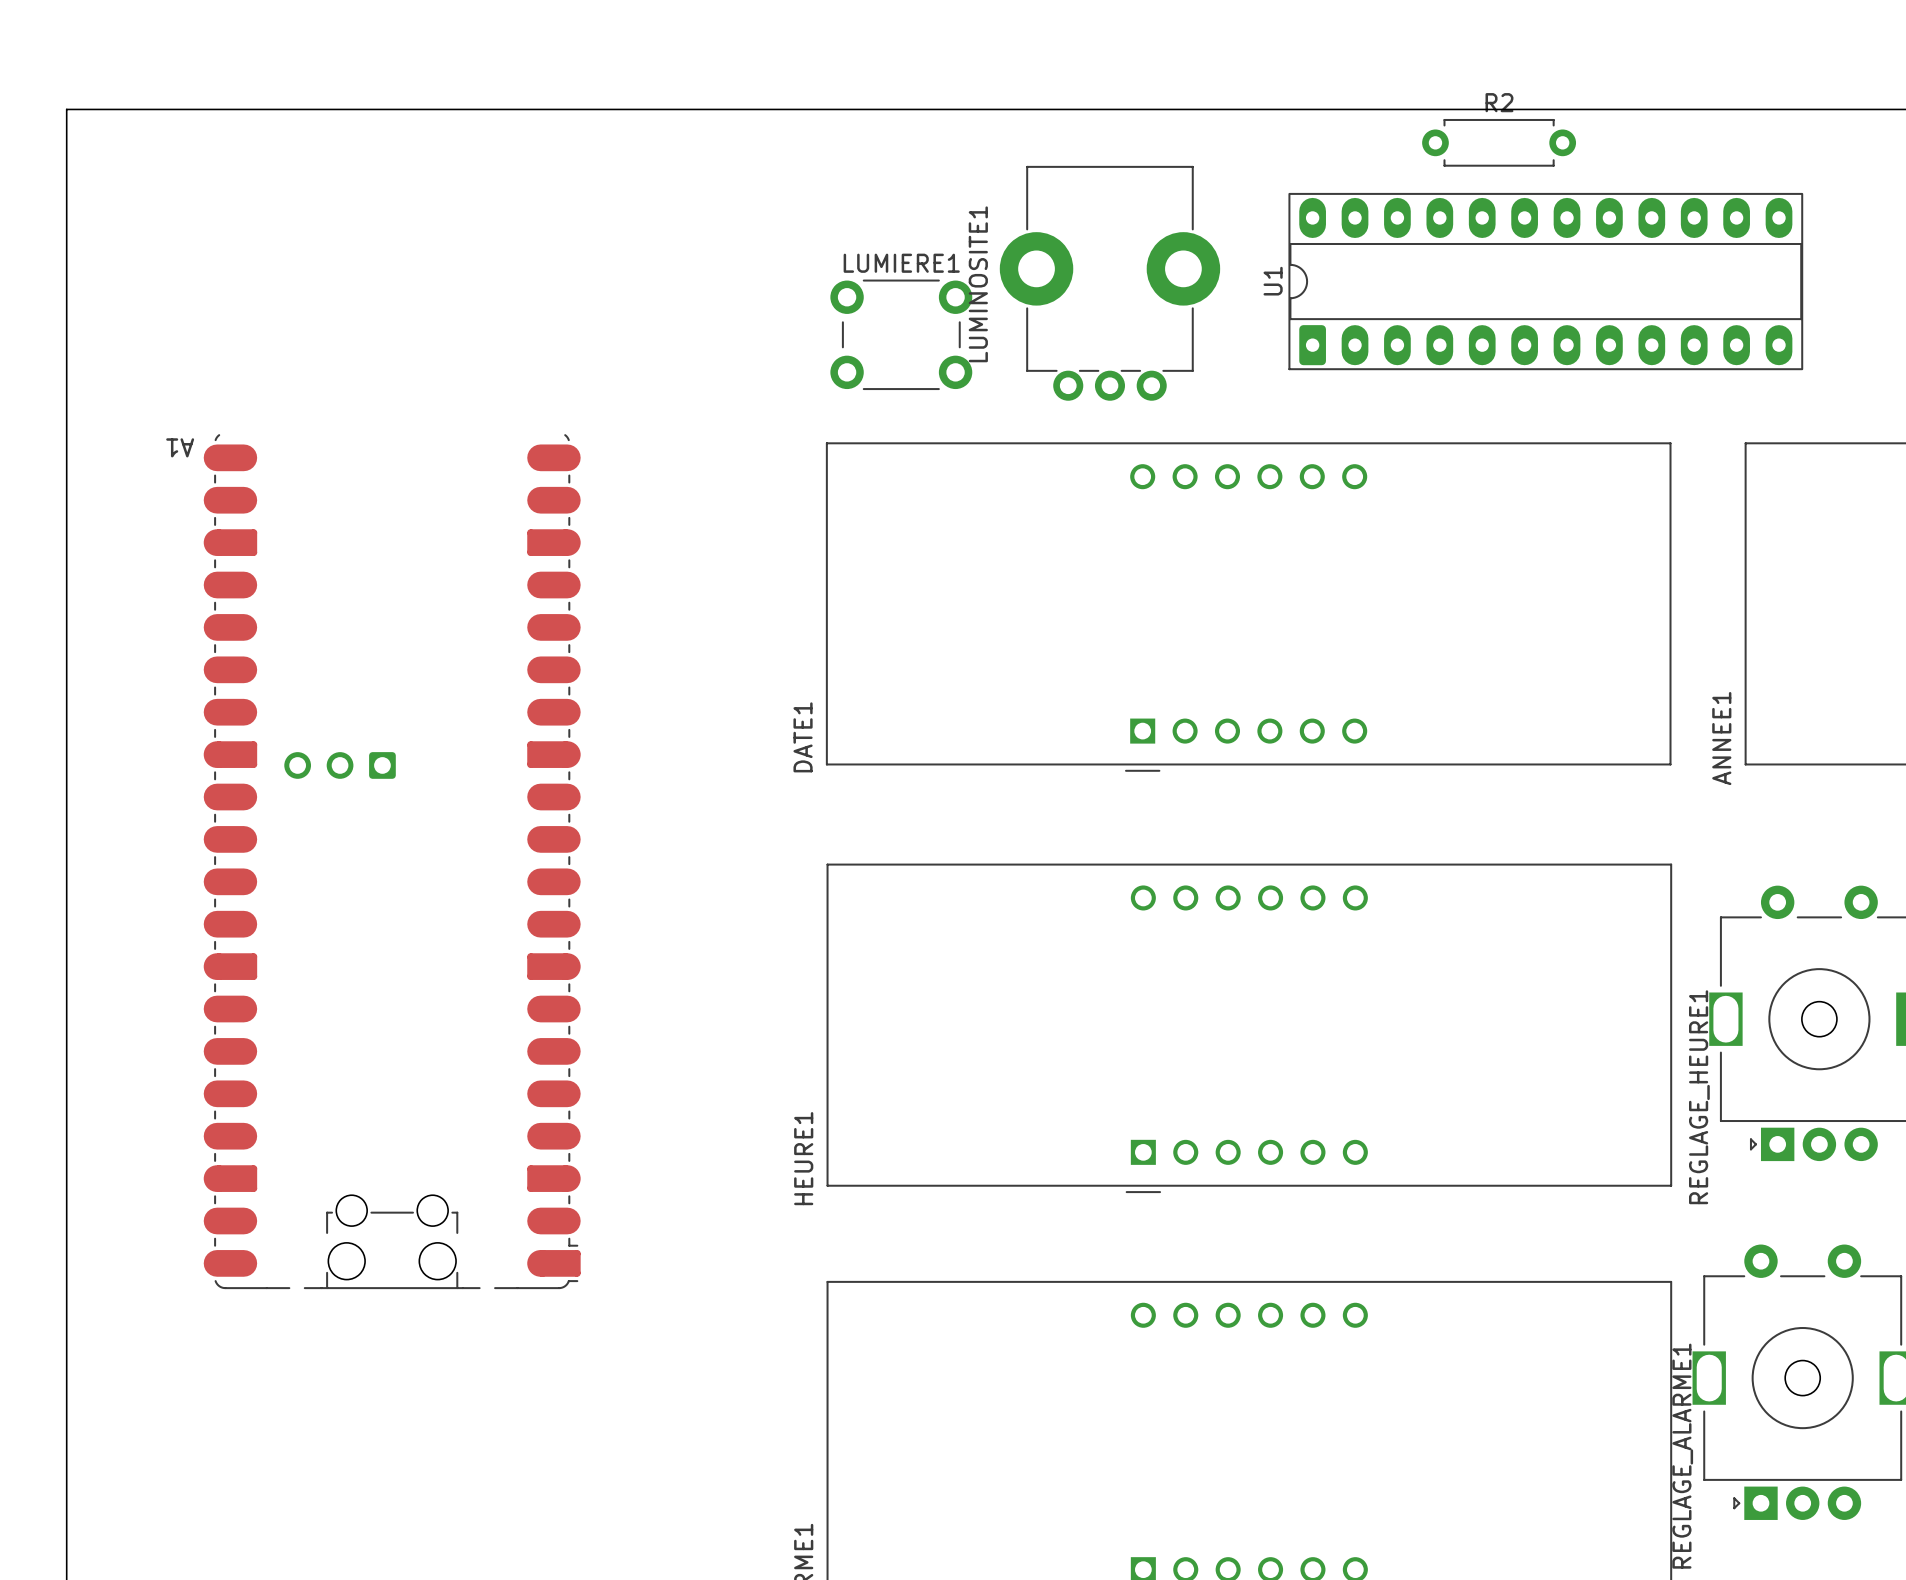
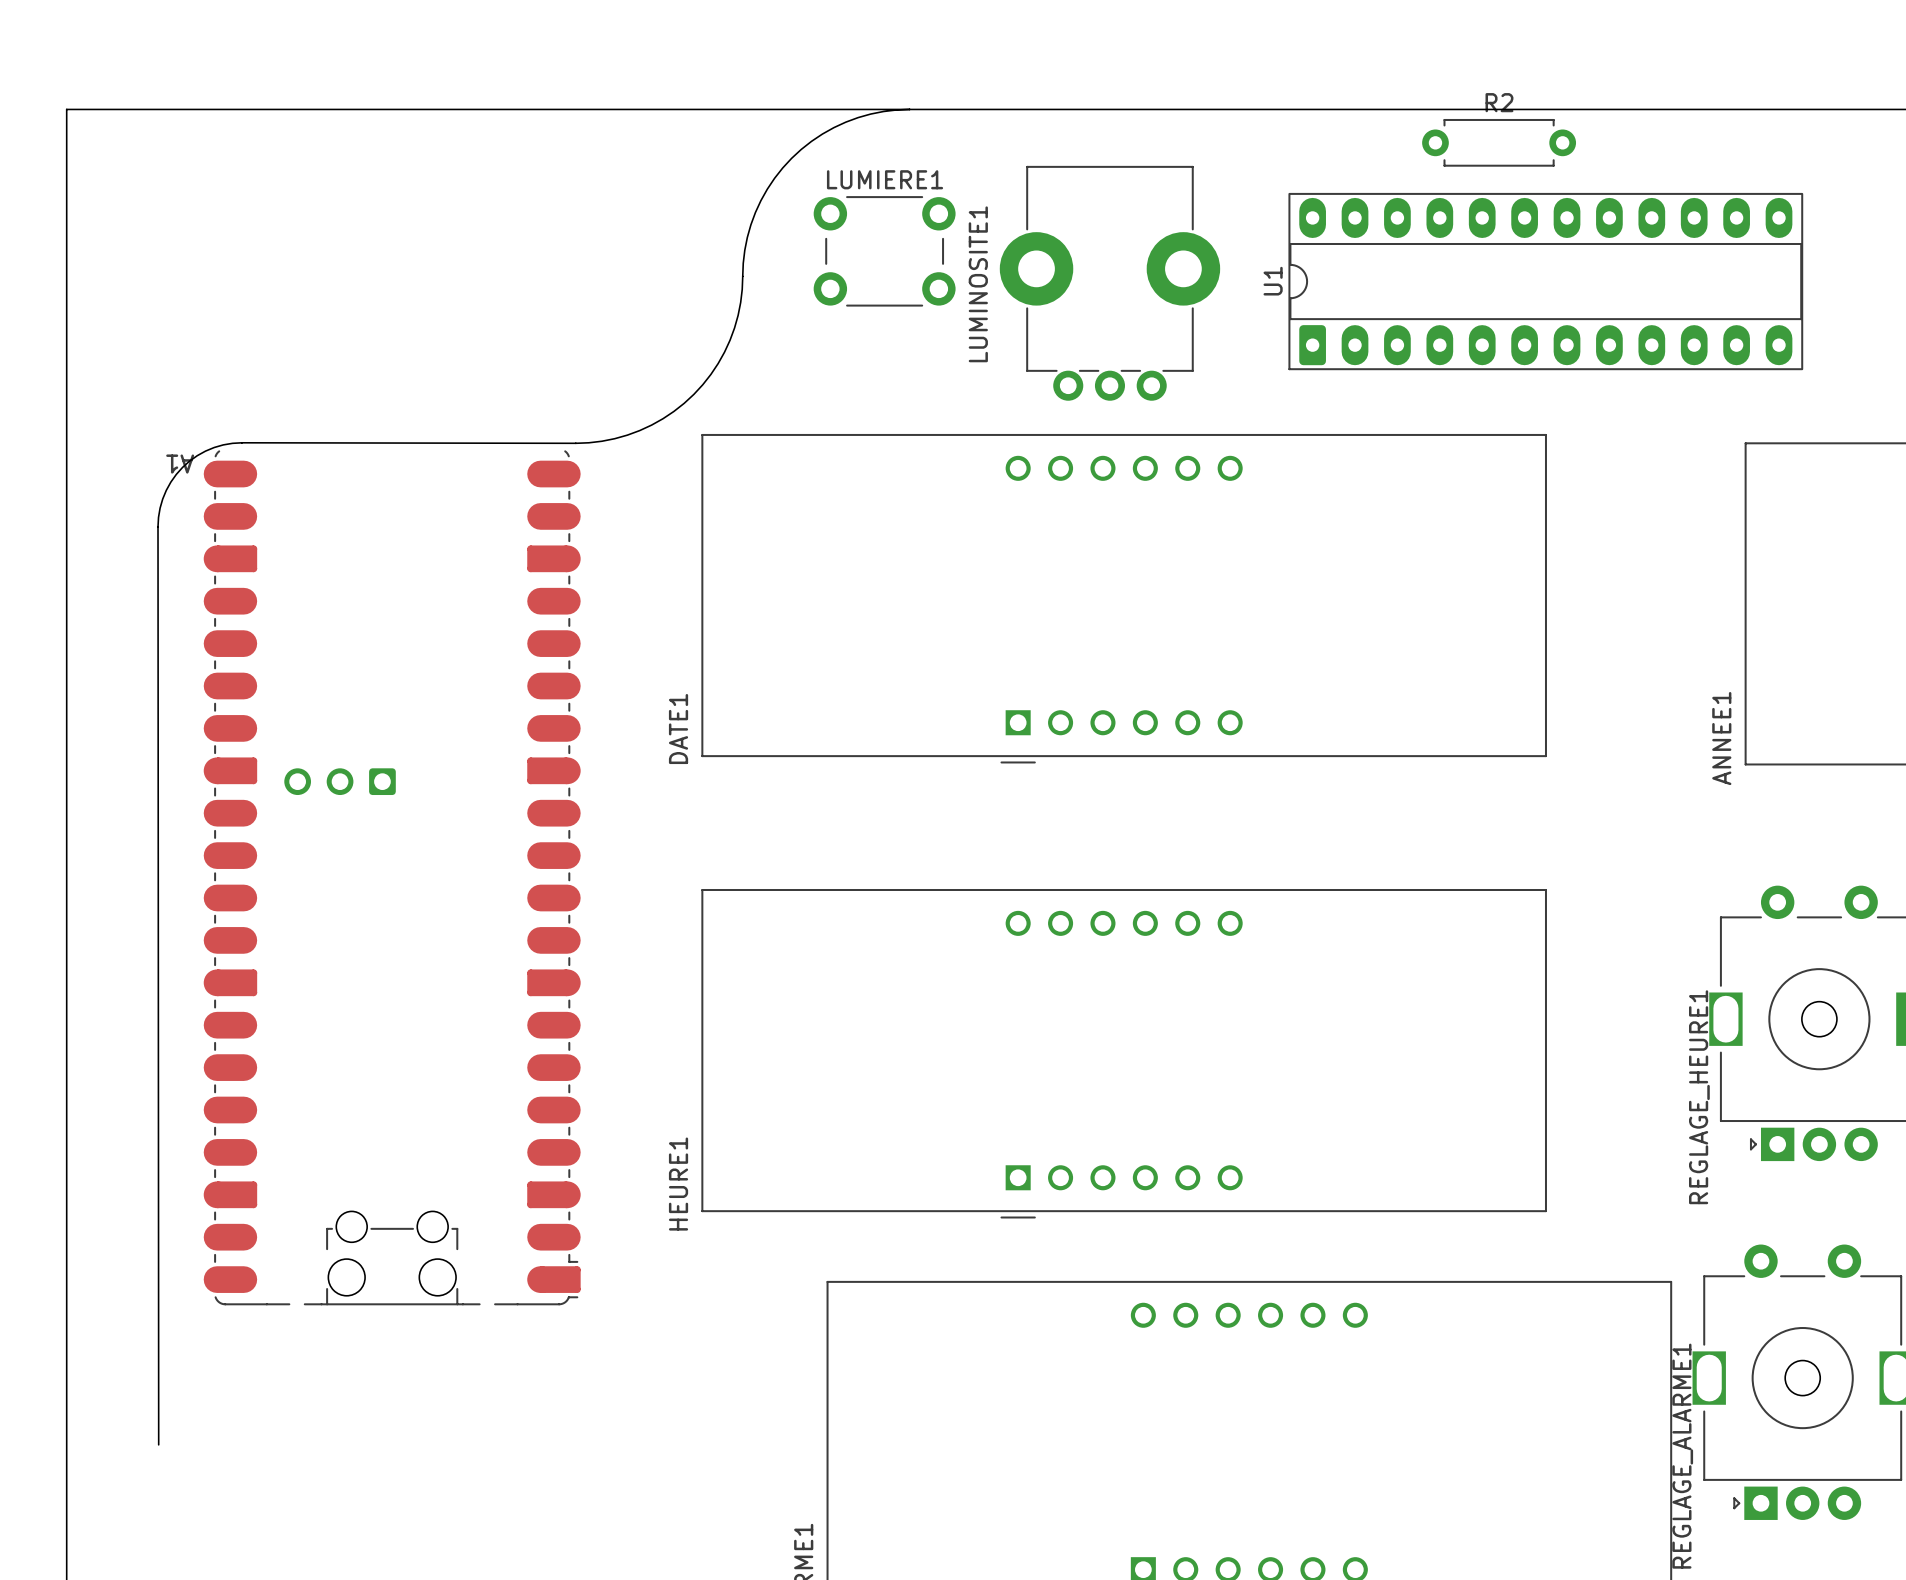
board edge: none -> (909, 109) (870, 114) (833, 127) (801, 149) (782, 167) (767, 189) (750, 224) (744, 250) (738, 315) (724, 352) (710, 374) (693, 394) (673, 411) (651, 425) (614, 438) (588, 442) (232, 443) (214, 447) (197, 455) (182, 467) (170, 482) (162, 499) (158, 526) (158, 1444)
LUMIERE1 position: (901, 334) -> (884, 251)
DATE1 position: (1248, 607) -> (1124, 598)
A1 position: (392, 861) -> (392, 877)
HEURE1 position: (1249, 1028) -> (1124, 1053)

